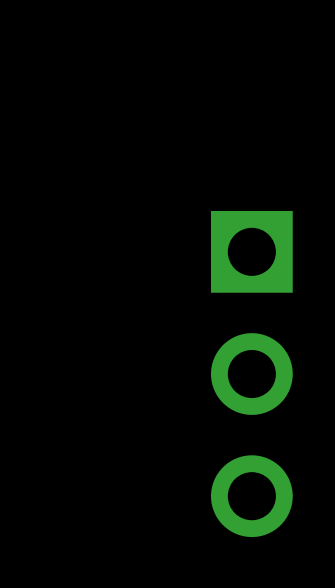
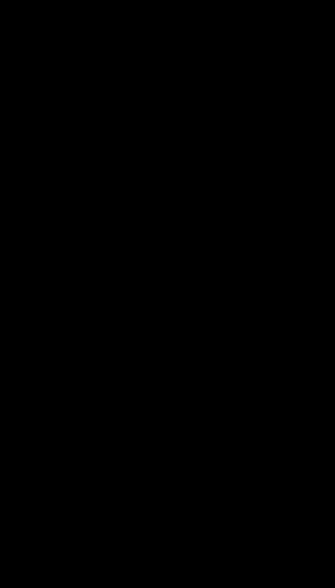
part: (251, 374) -> none

